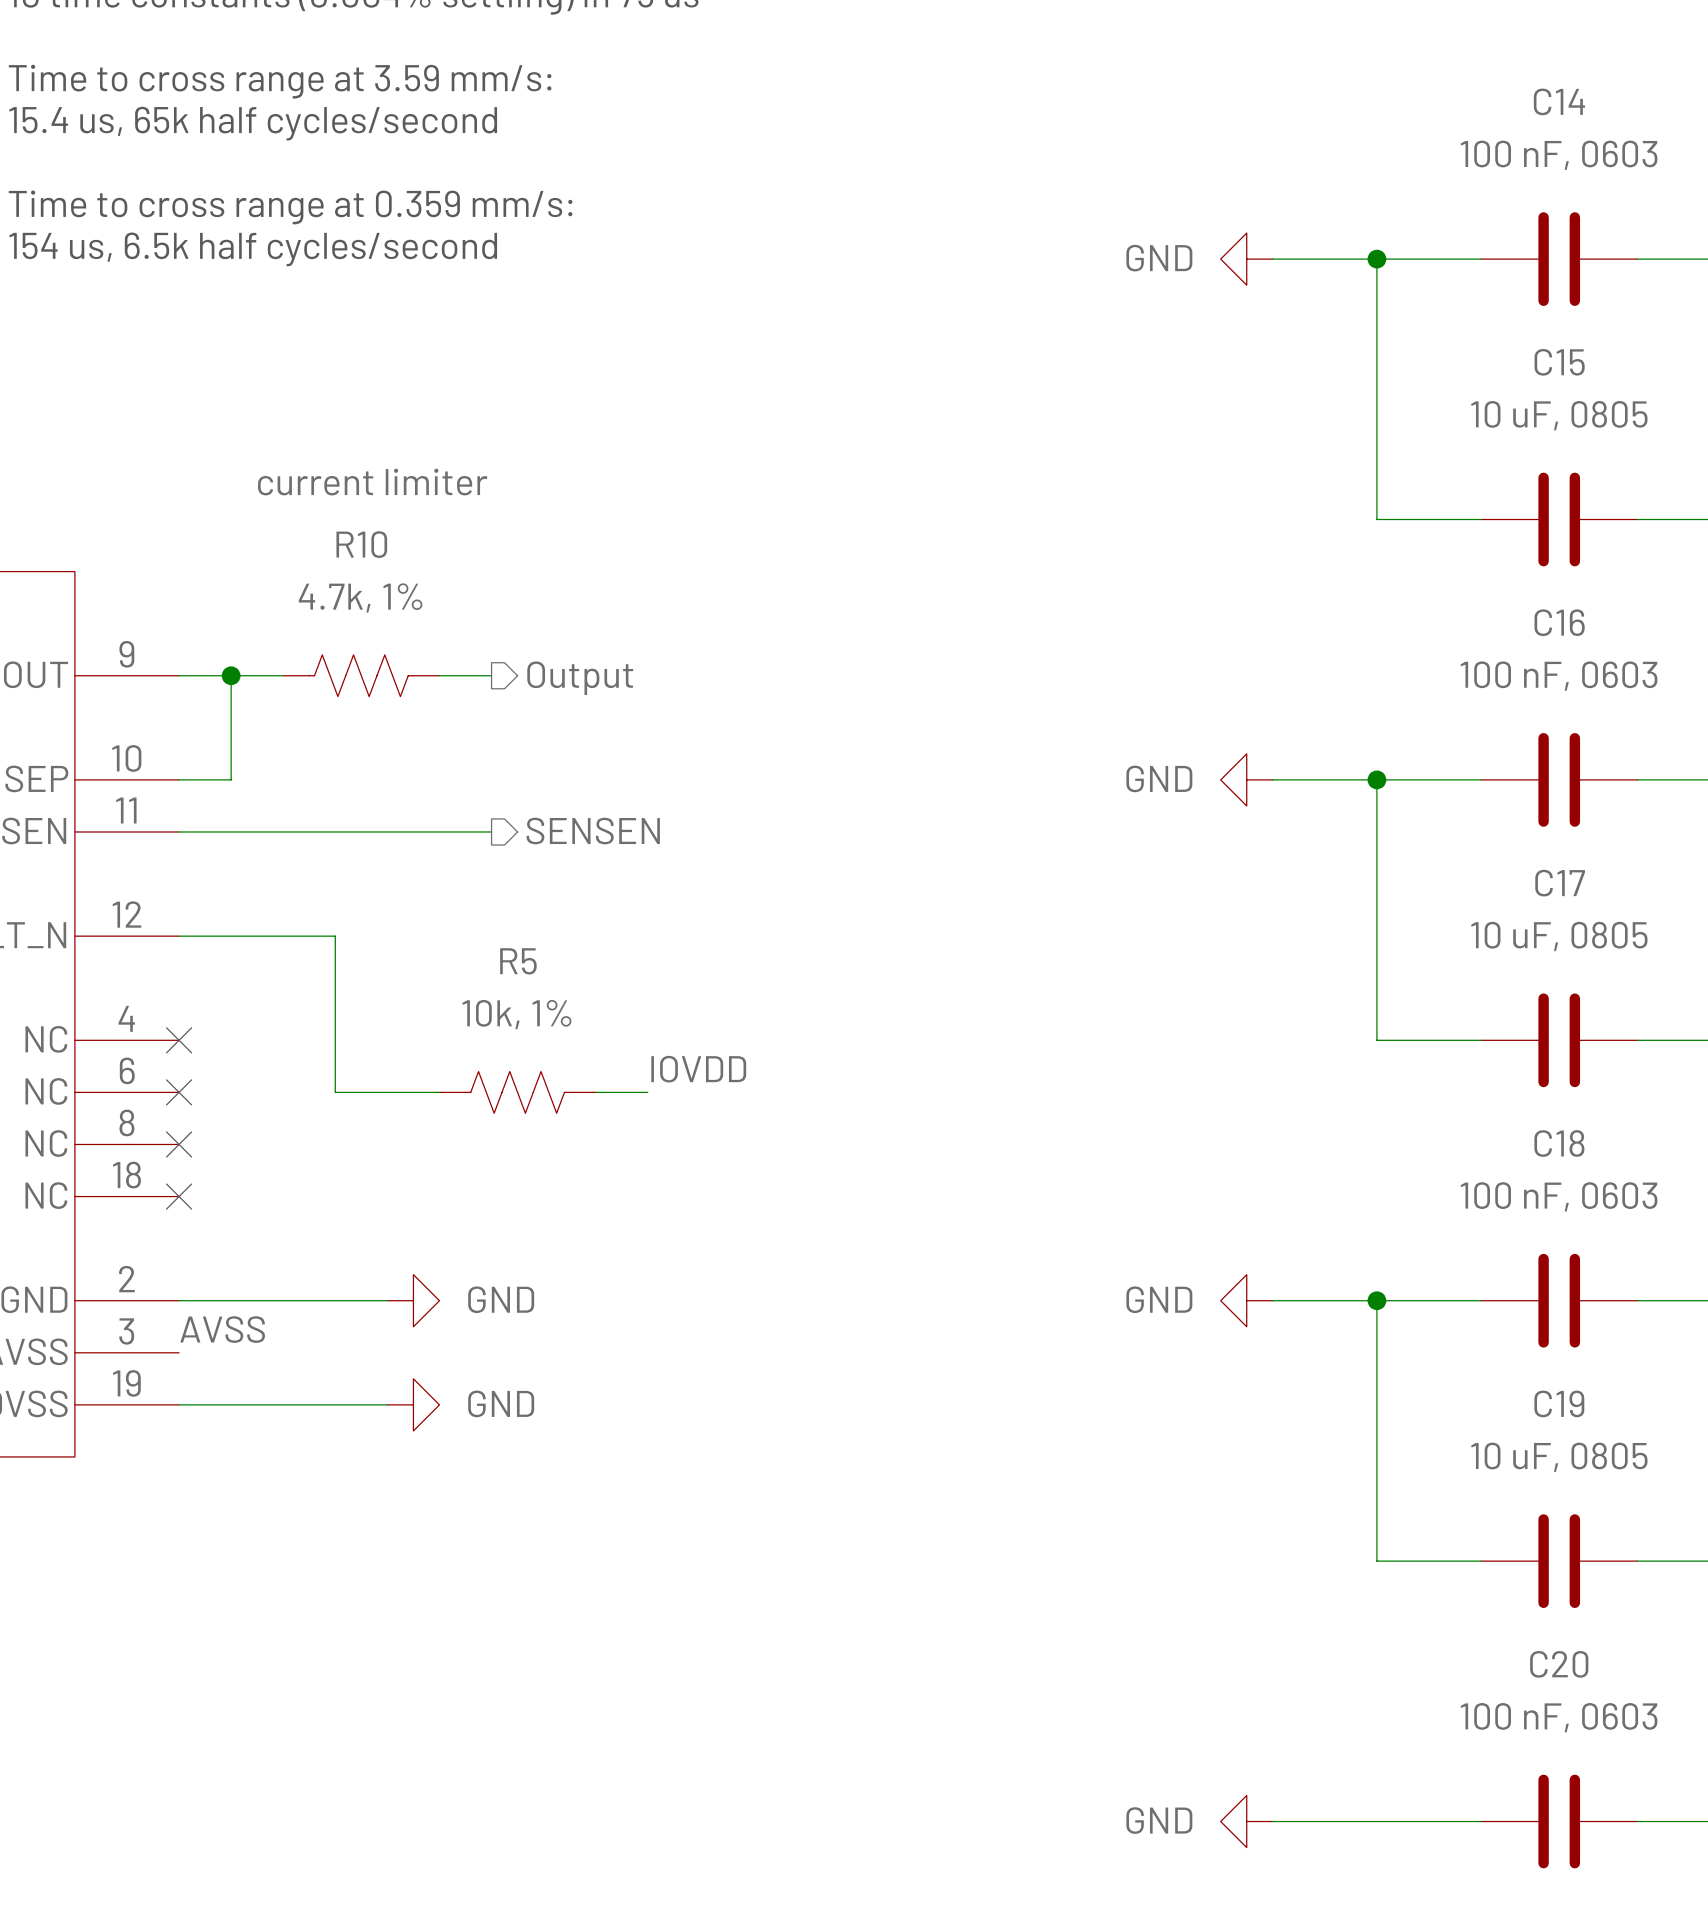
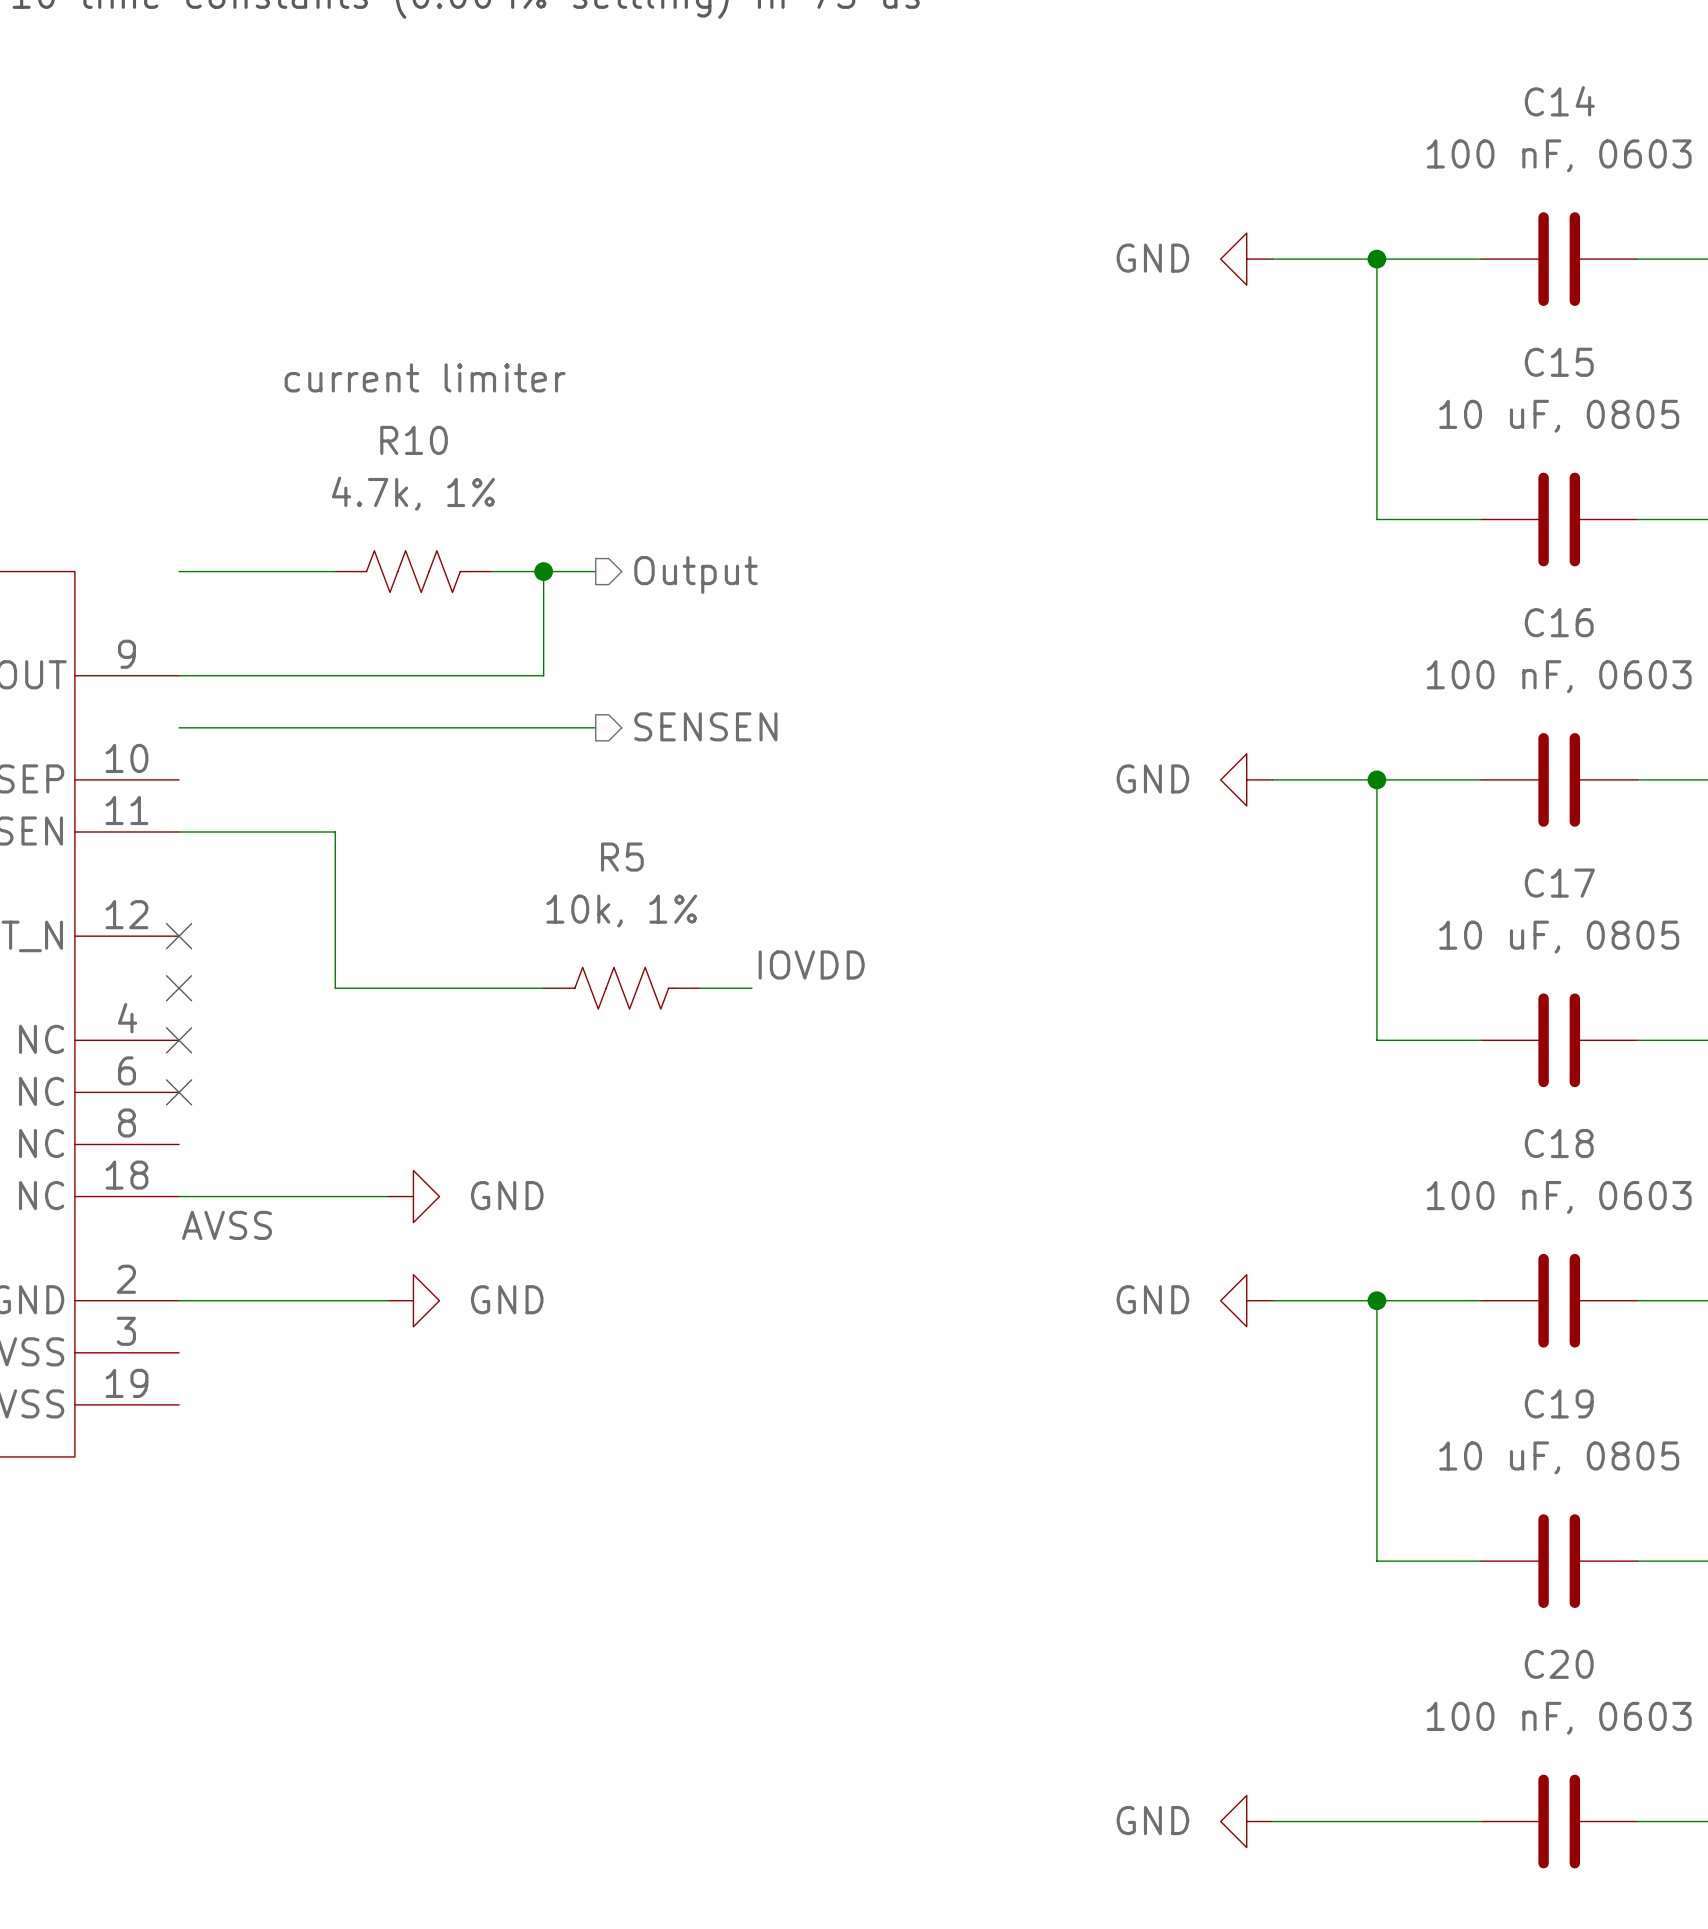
text: Time to cross range at 3.59 mm/s: (280, 81) -> none
text: 15.4 us, 65k half cycles/second (253, 123) -> none
text: Time to cross range at 0.359 mm/s: (290, 207) -> none
text: 154 us, 6.5k half cycles/second (253, 249) -> none
wire: none -> (179, 571) (335, 571)
wire: none -> (491, 571) (595, 571)
junction: none -> (543, 571)
wire: (231, 675) (231, 779) (179, 779) -> (543, 571) (543, 675) (491, 675)
junction: (231, 675) -> none
R10 position: (361, 675) -> (413, 571)
hierarchical label position: Output (580, 678) -> Output (695, 574)
wire: none -> (179, 727) (595, 727)
wire: (335, 831) (491, 831) -> (283, 675) (439, 675)
hierarchical label position: SENSEN (593, 831) -> SENSEN (705, 726)
wire: (179, 936) (335, 936) -> (335, 831) (335, 936)
no-connect mark: none -> (179, 936)
no-connect mark: none -> (179, 988)
wire: (335, 988) (335, 1092) (439, 1092) -> (335, 988) (543, 988)
label position: IOVDD (698, 1069) -> IOVDD (811, 964)
R5 position: (517, 1092) -> (621, 988)
wire: (595, 1092) (647, 1092) -> (699, 988) (751, 988)
no-connect mark: (179, 1144) -> none
no-connect mark: (179, 1196) -> none
label position: AVSS (222, 1329) -> AVSS (227, 1225)
wire: (179, 1404) (387, 1404) -> (179, 1196) (387, 1196)
power symbol position: GND (413, 1404) -> GND (413, 1196)

